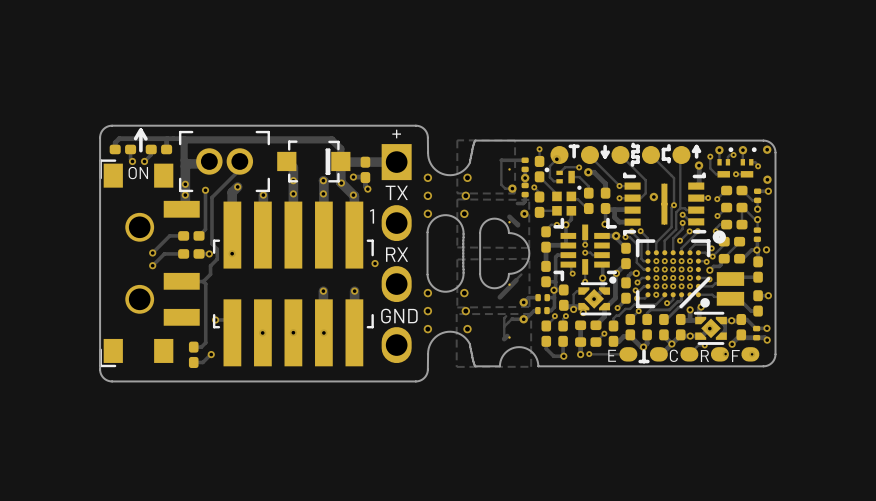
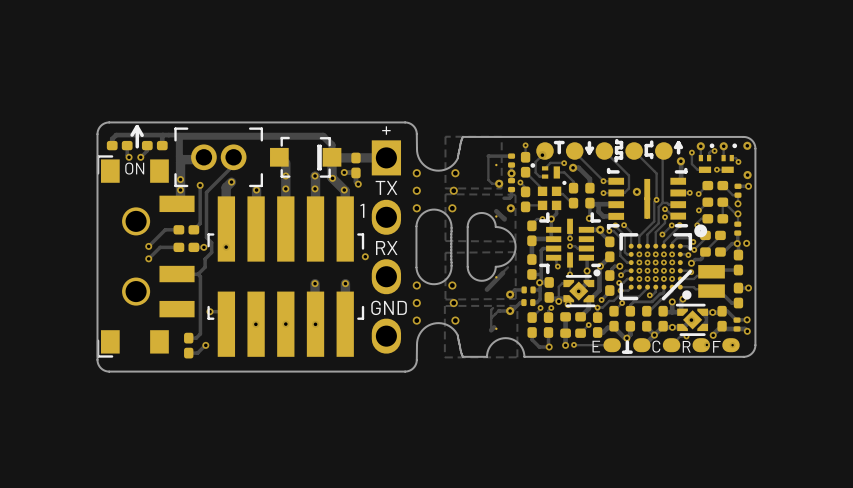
via position: (656, 294) -> (597, 307)

